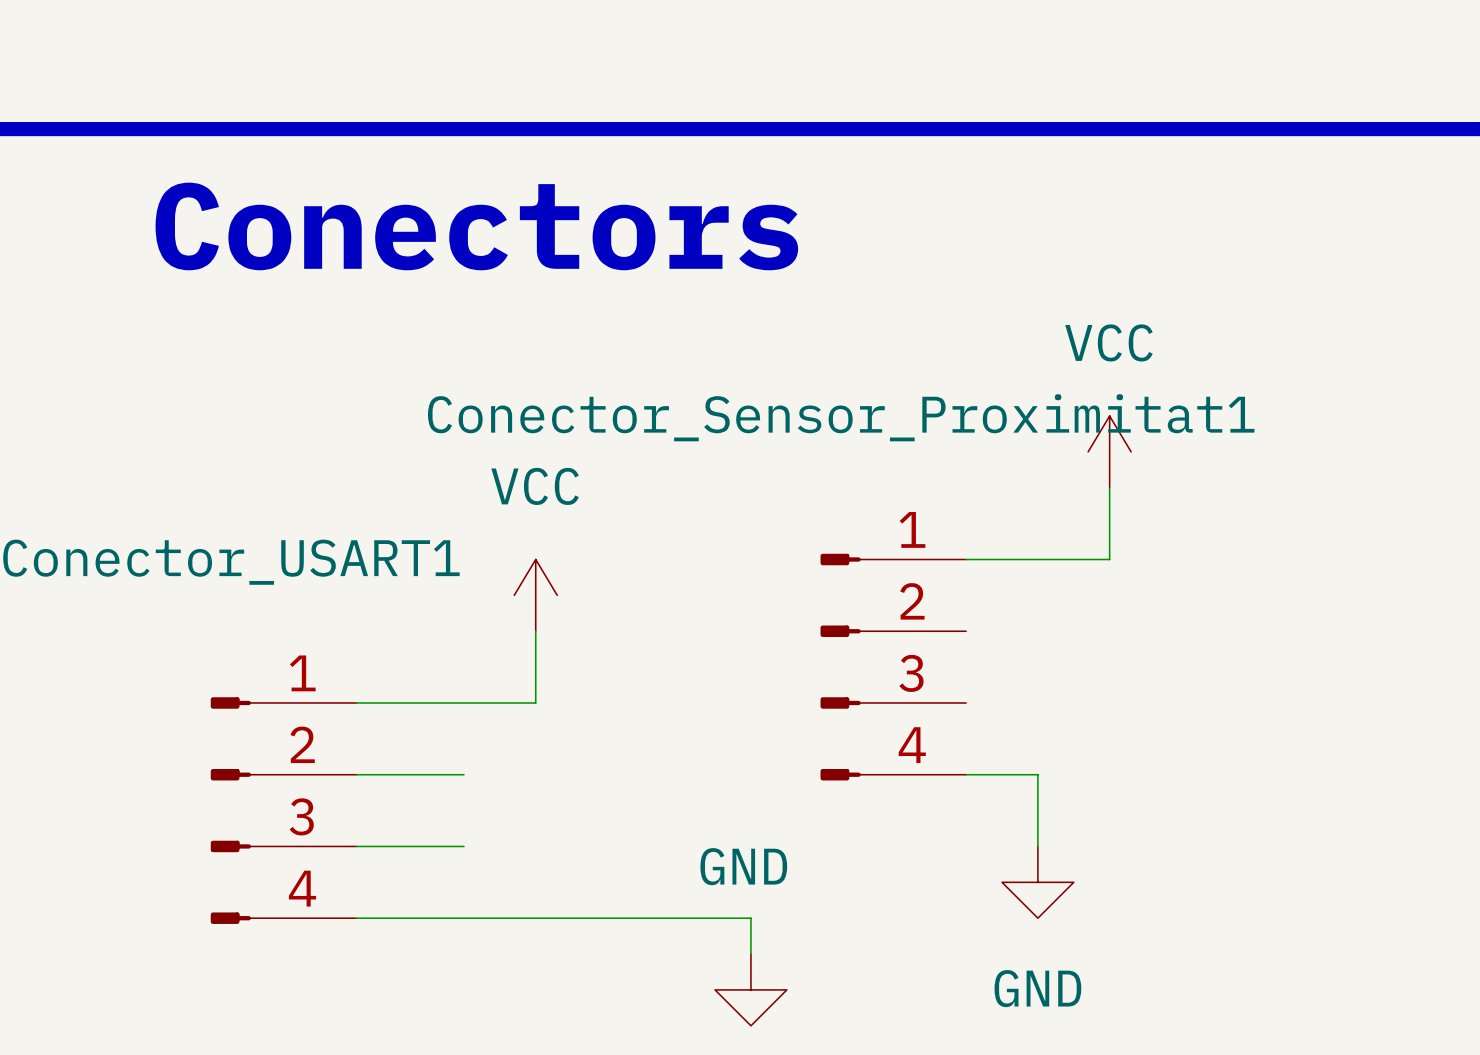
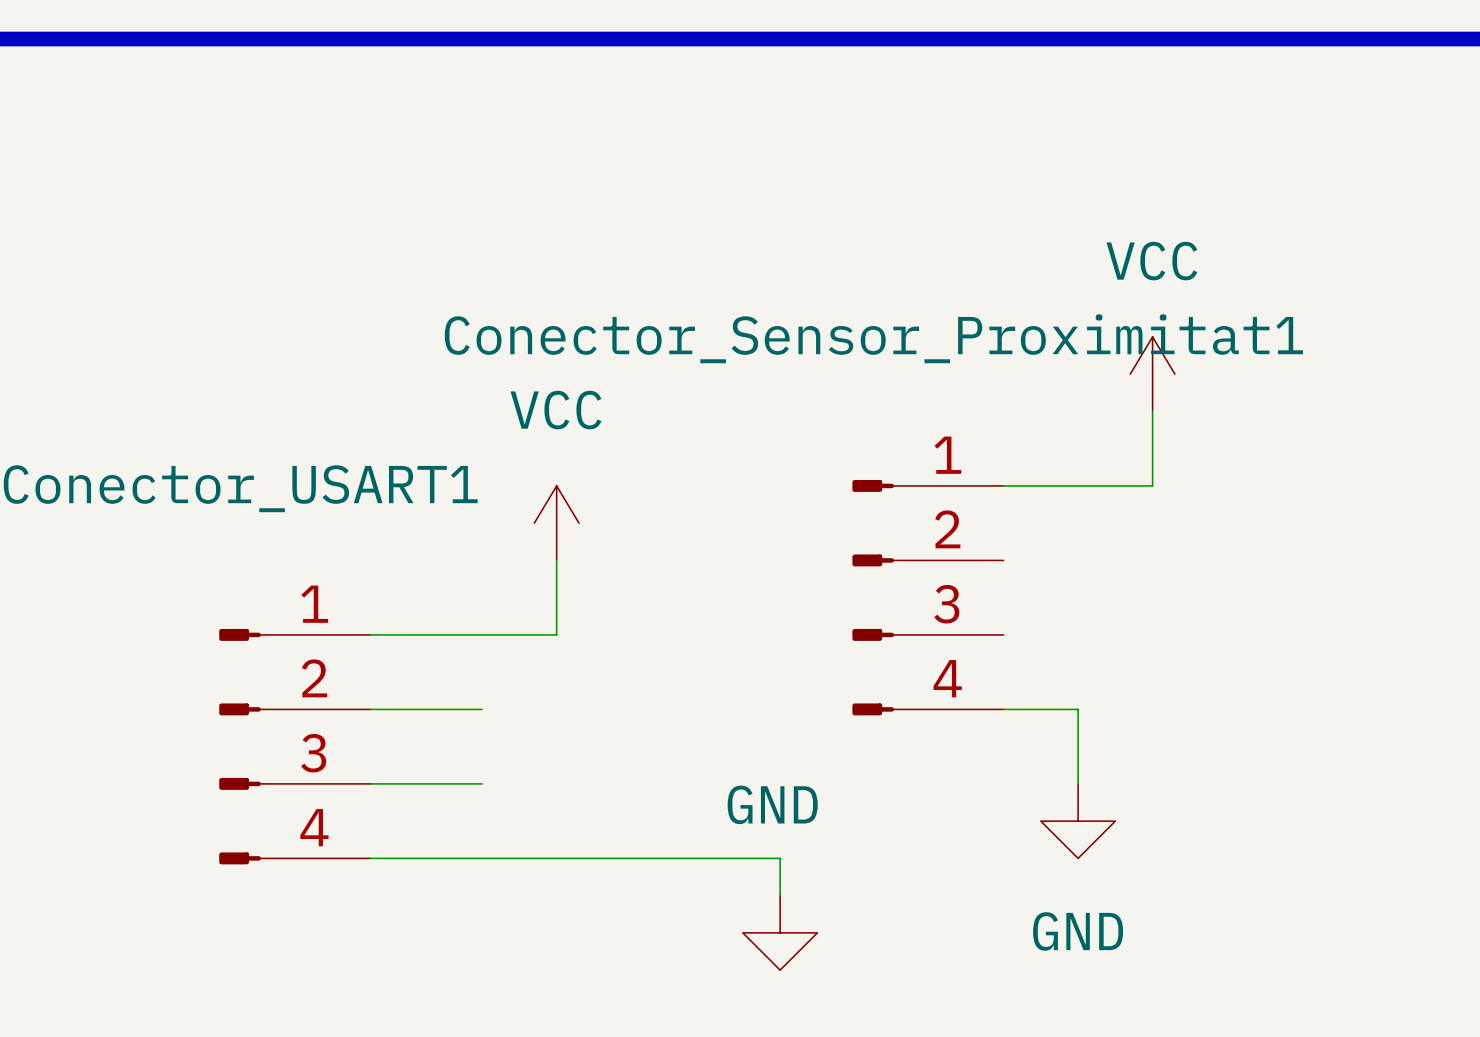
text: Conectors (476, 226) -> none

